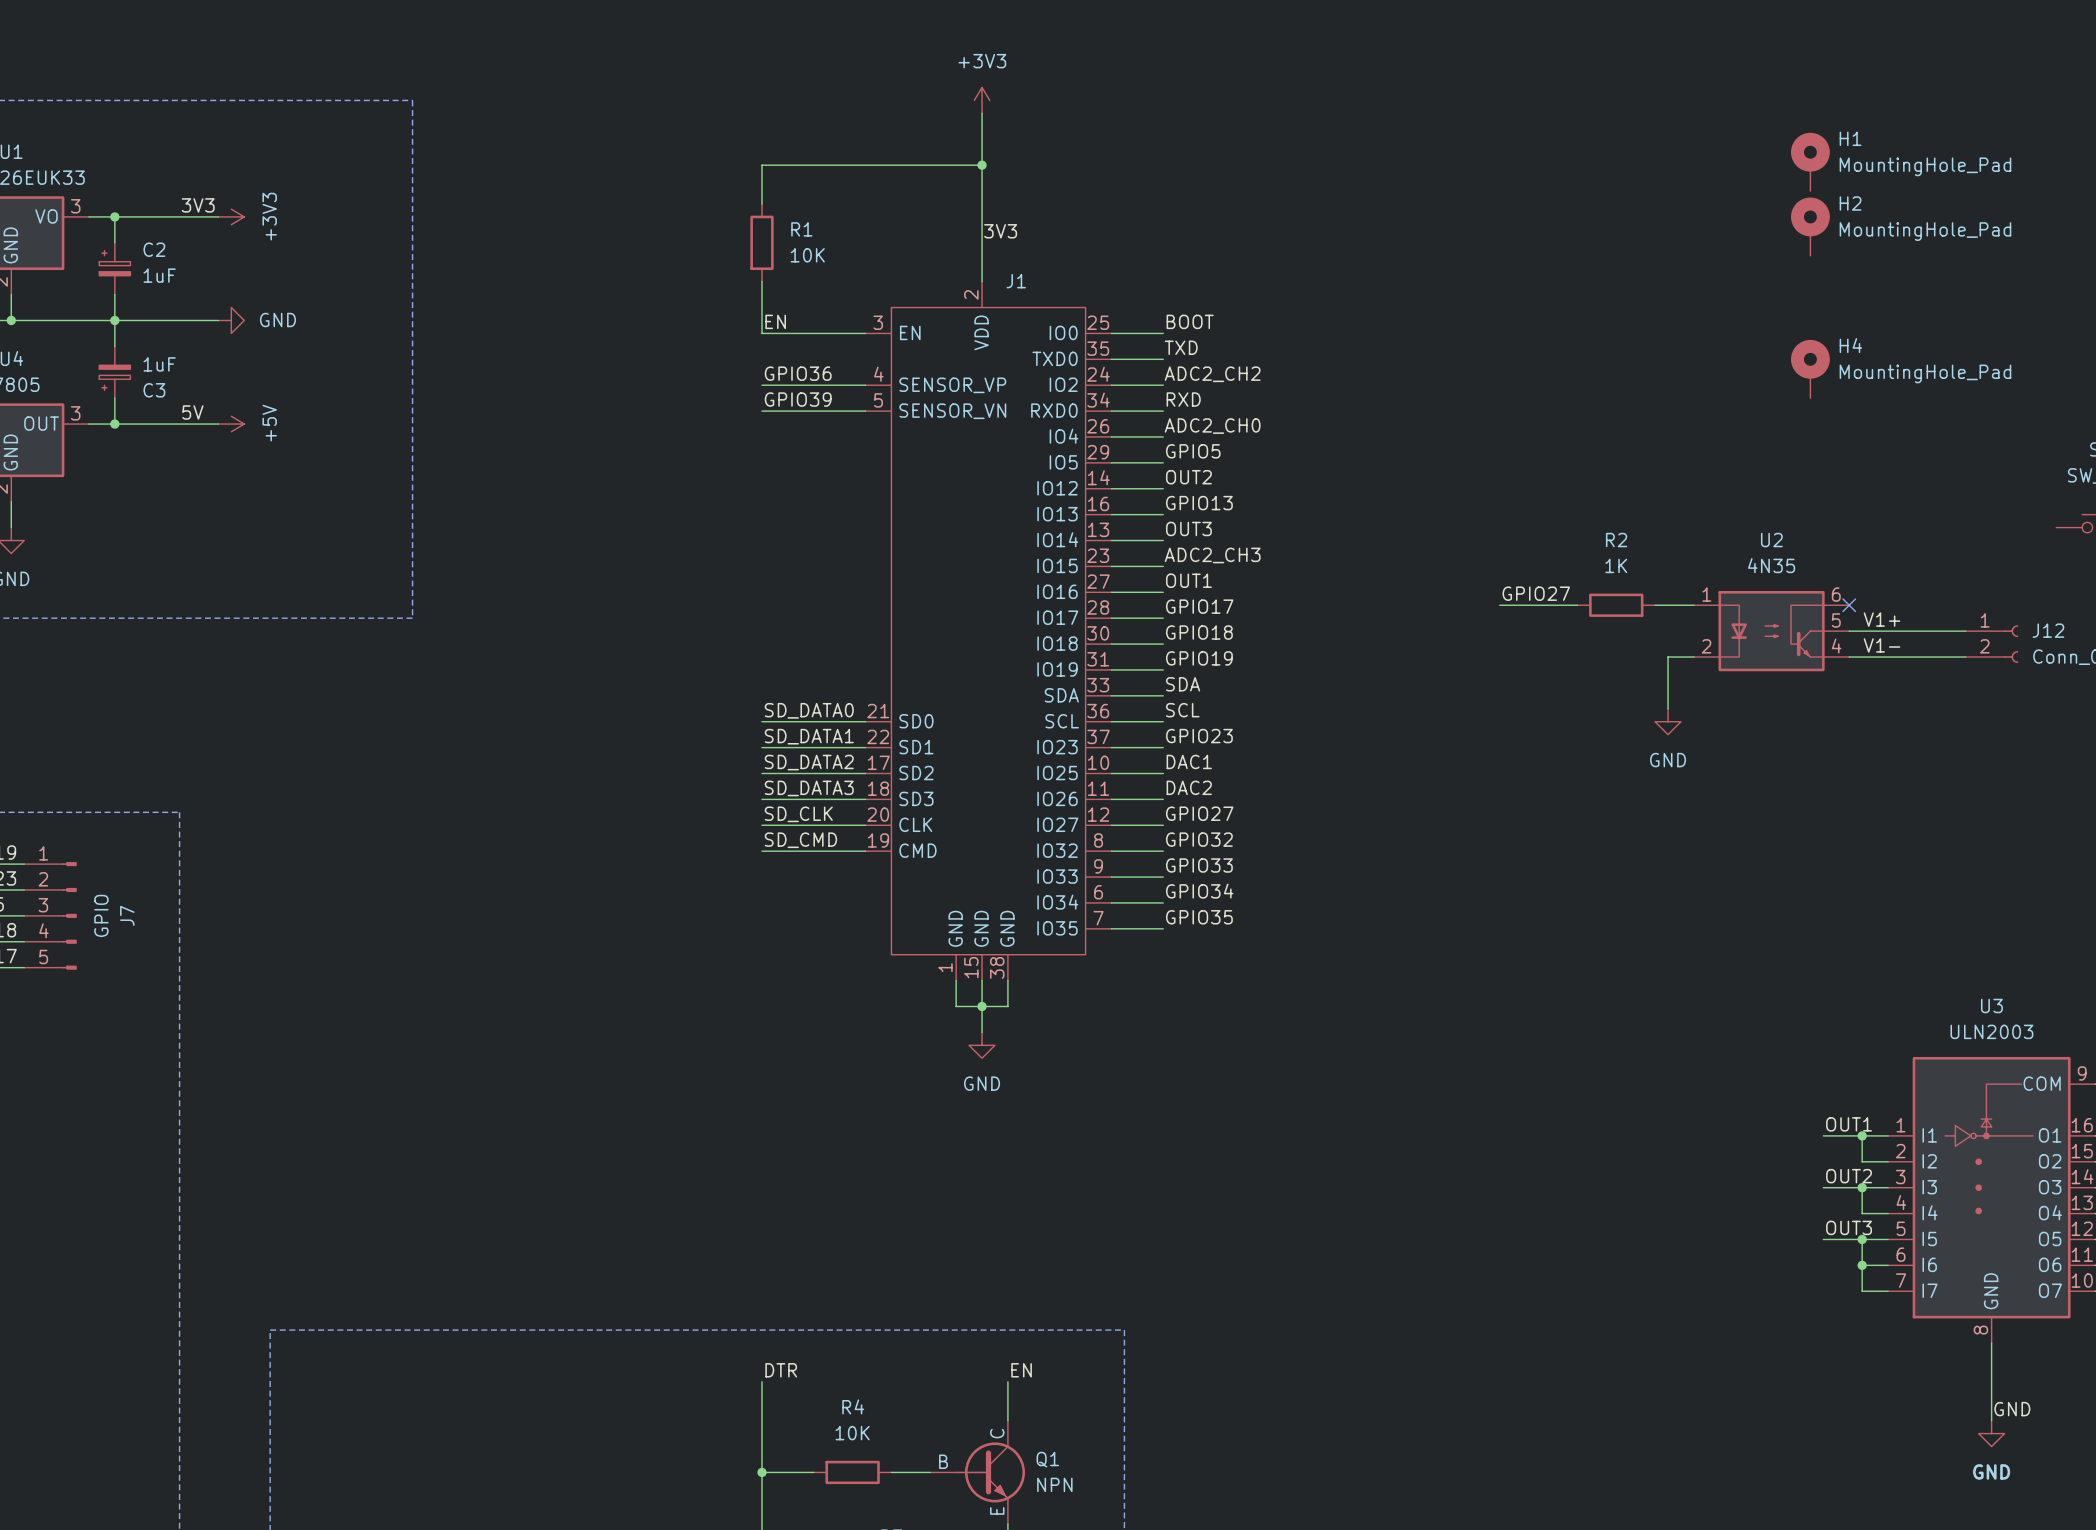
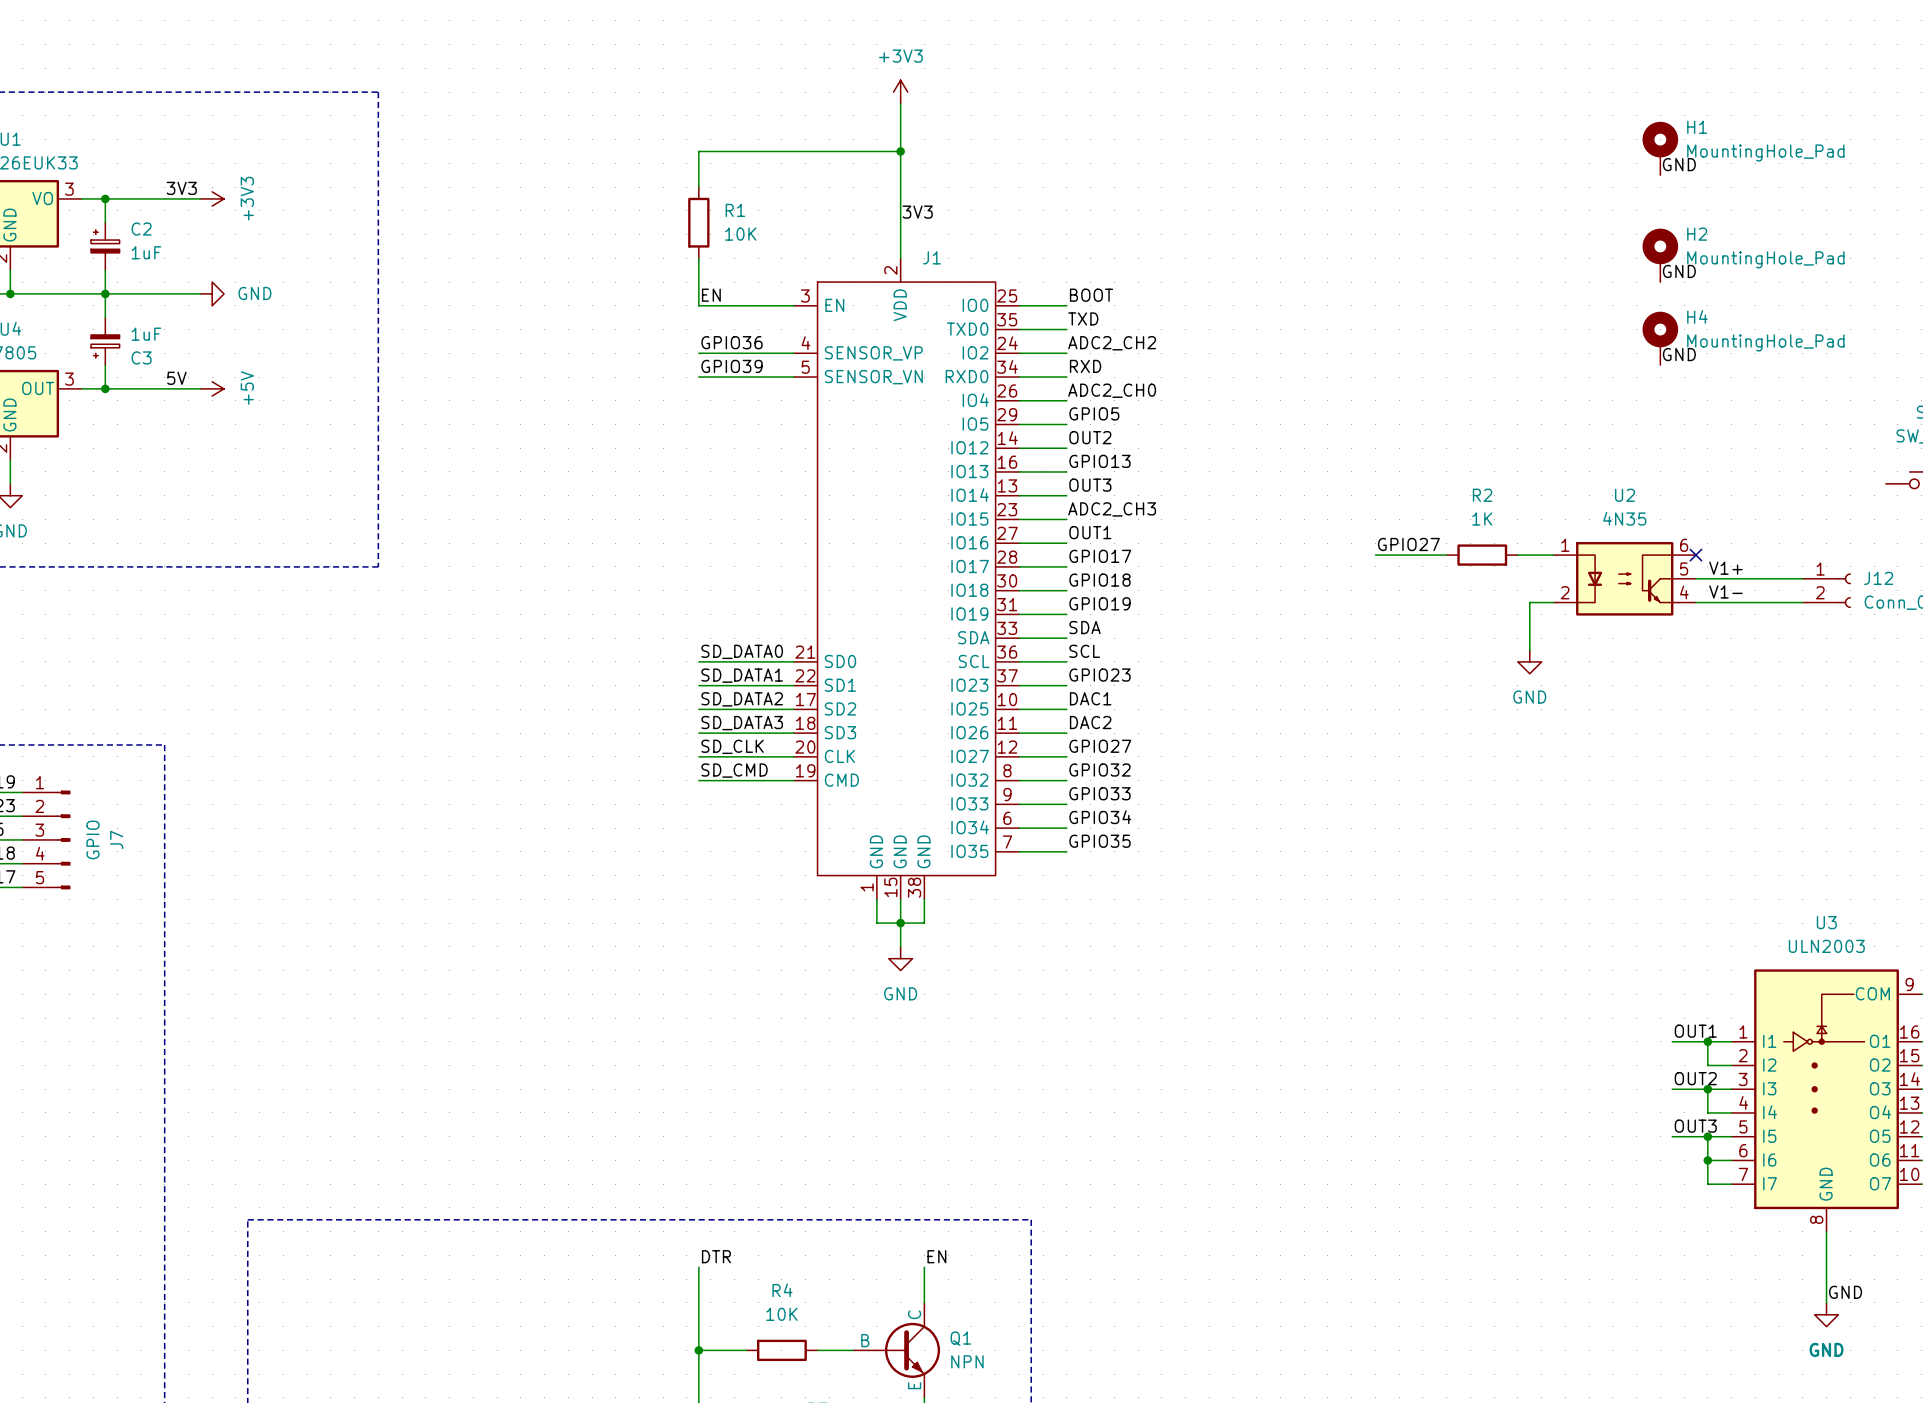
label: none -> GND (1679, 164)
H2 position: (1810, 226) -> (1660, 255)
label: none -> GND (1679, 271)
label: none -> GND (1679, 354)

